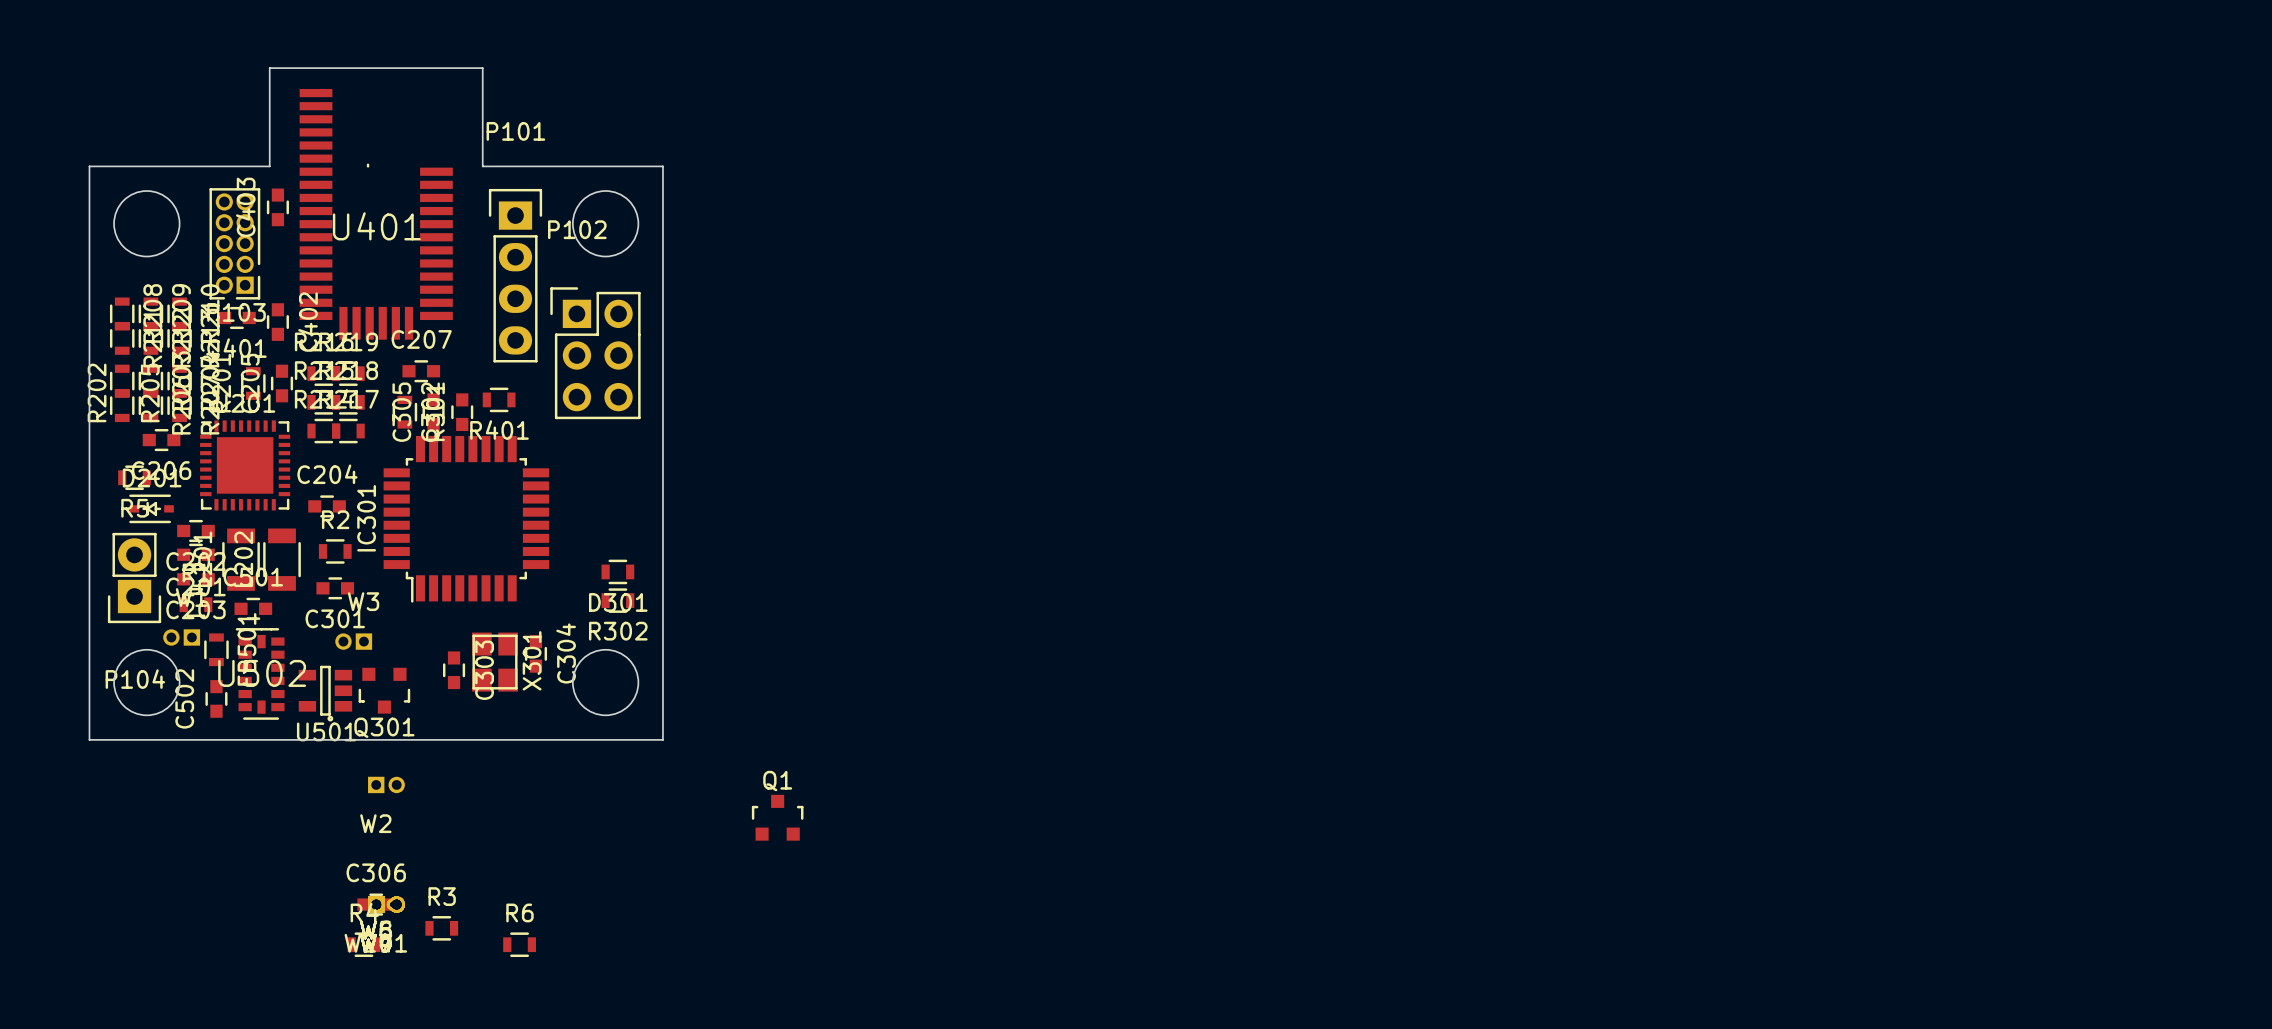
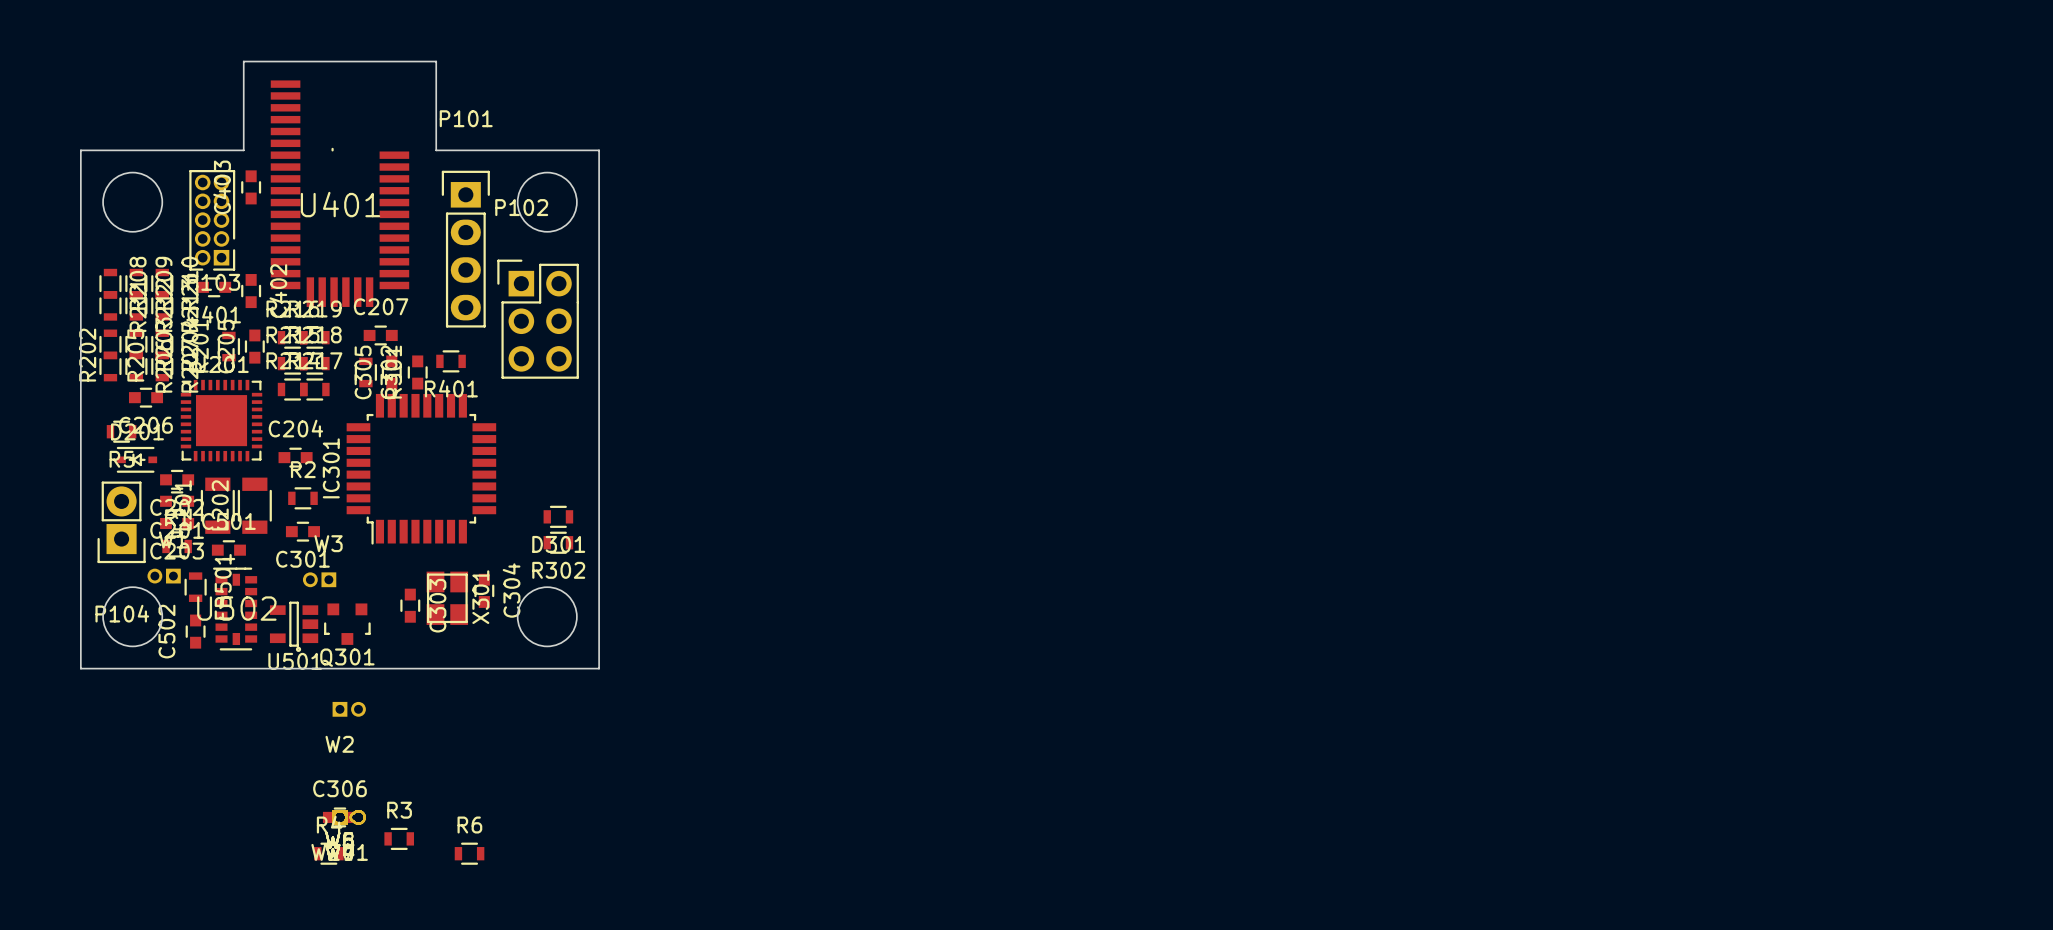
Q1: (777, 817) -> none

